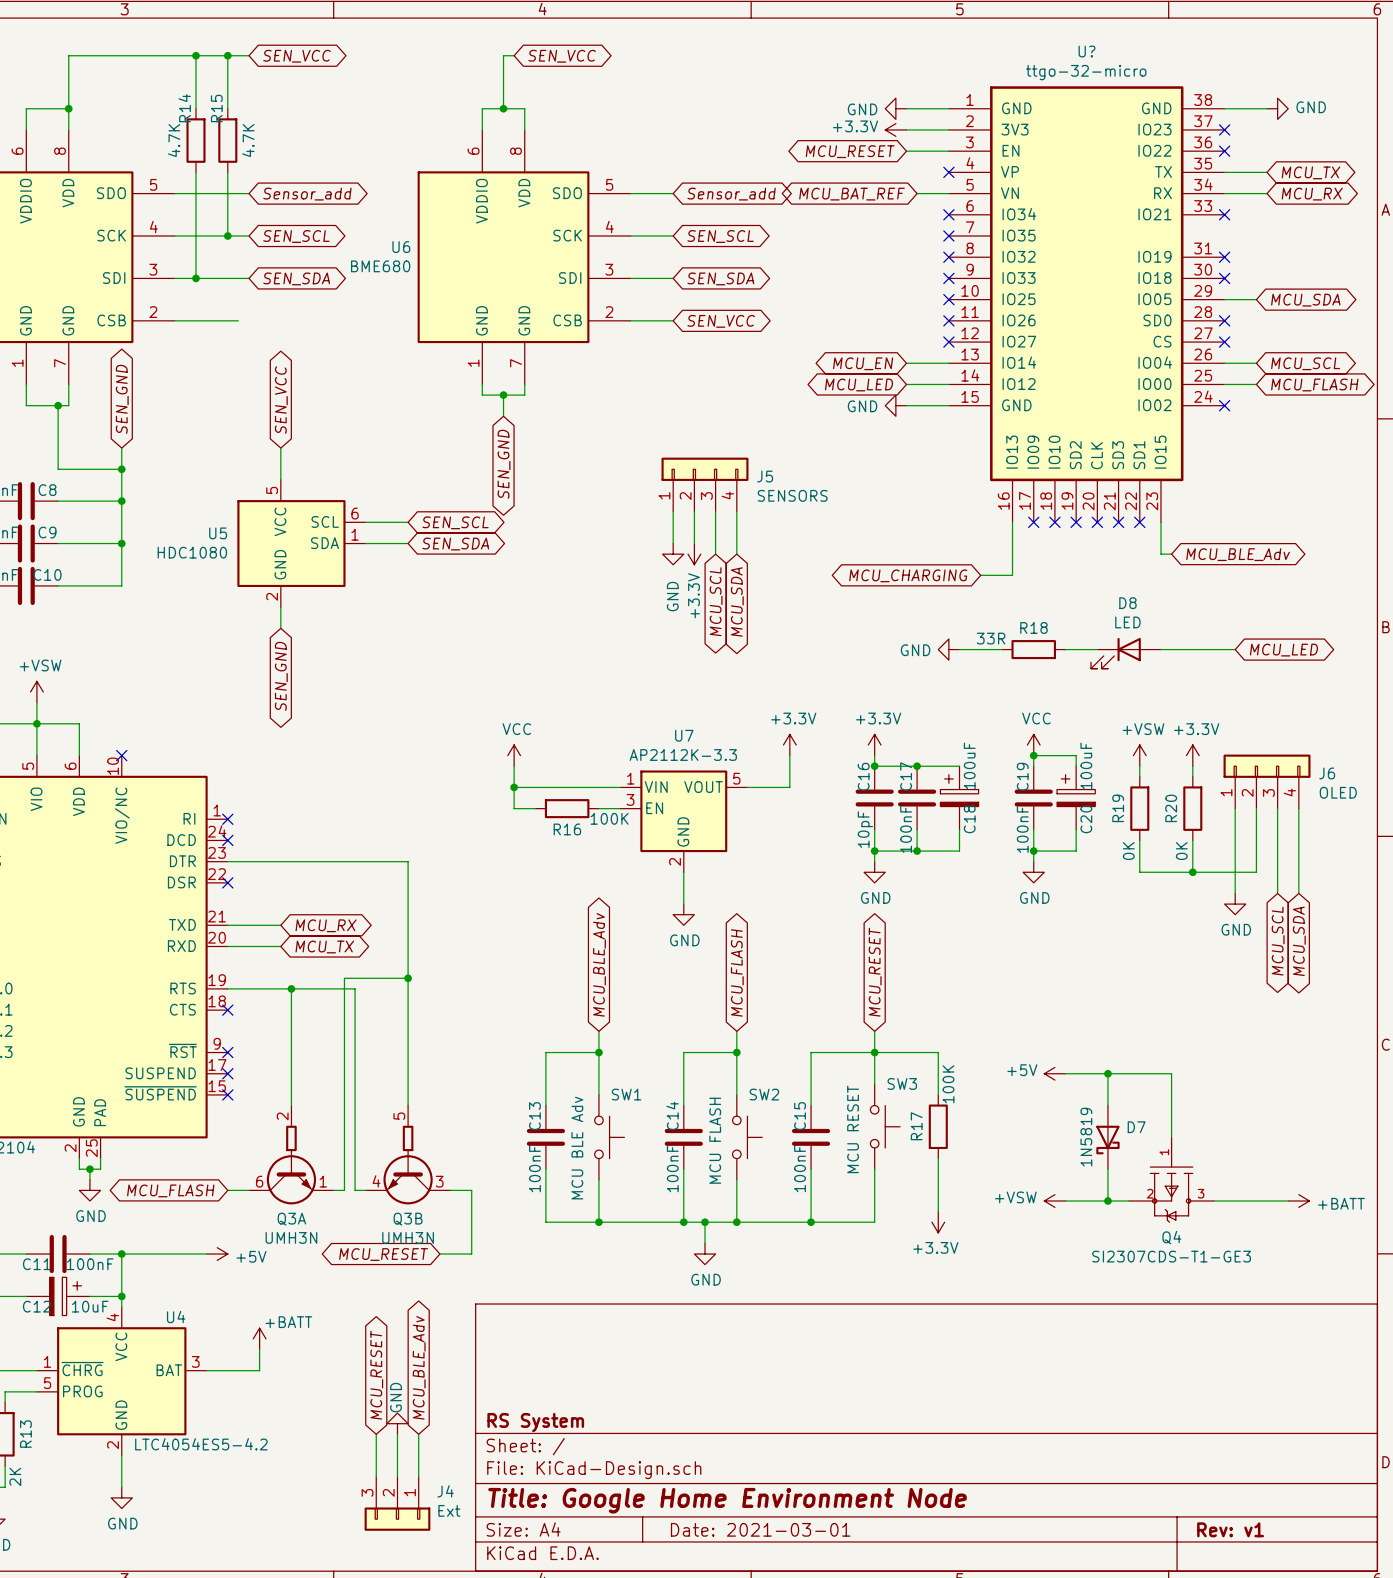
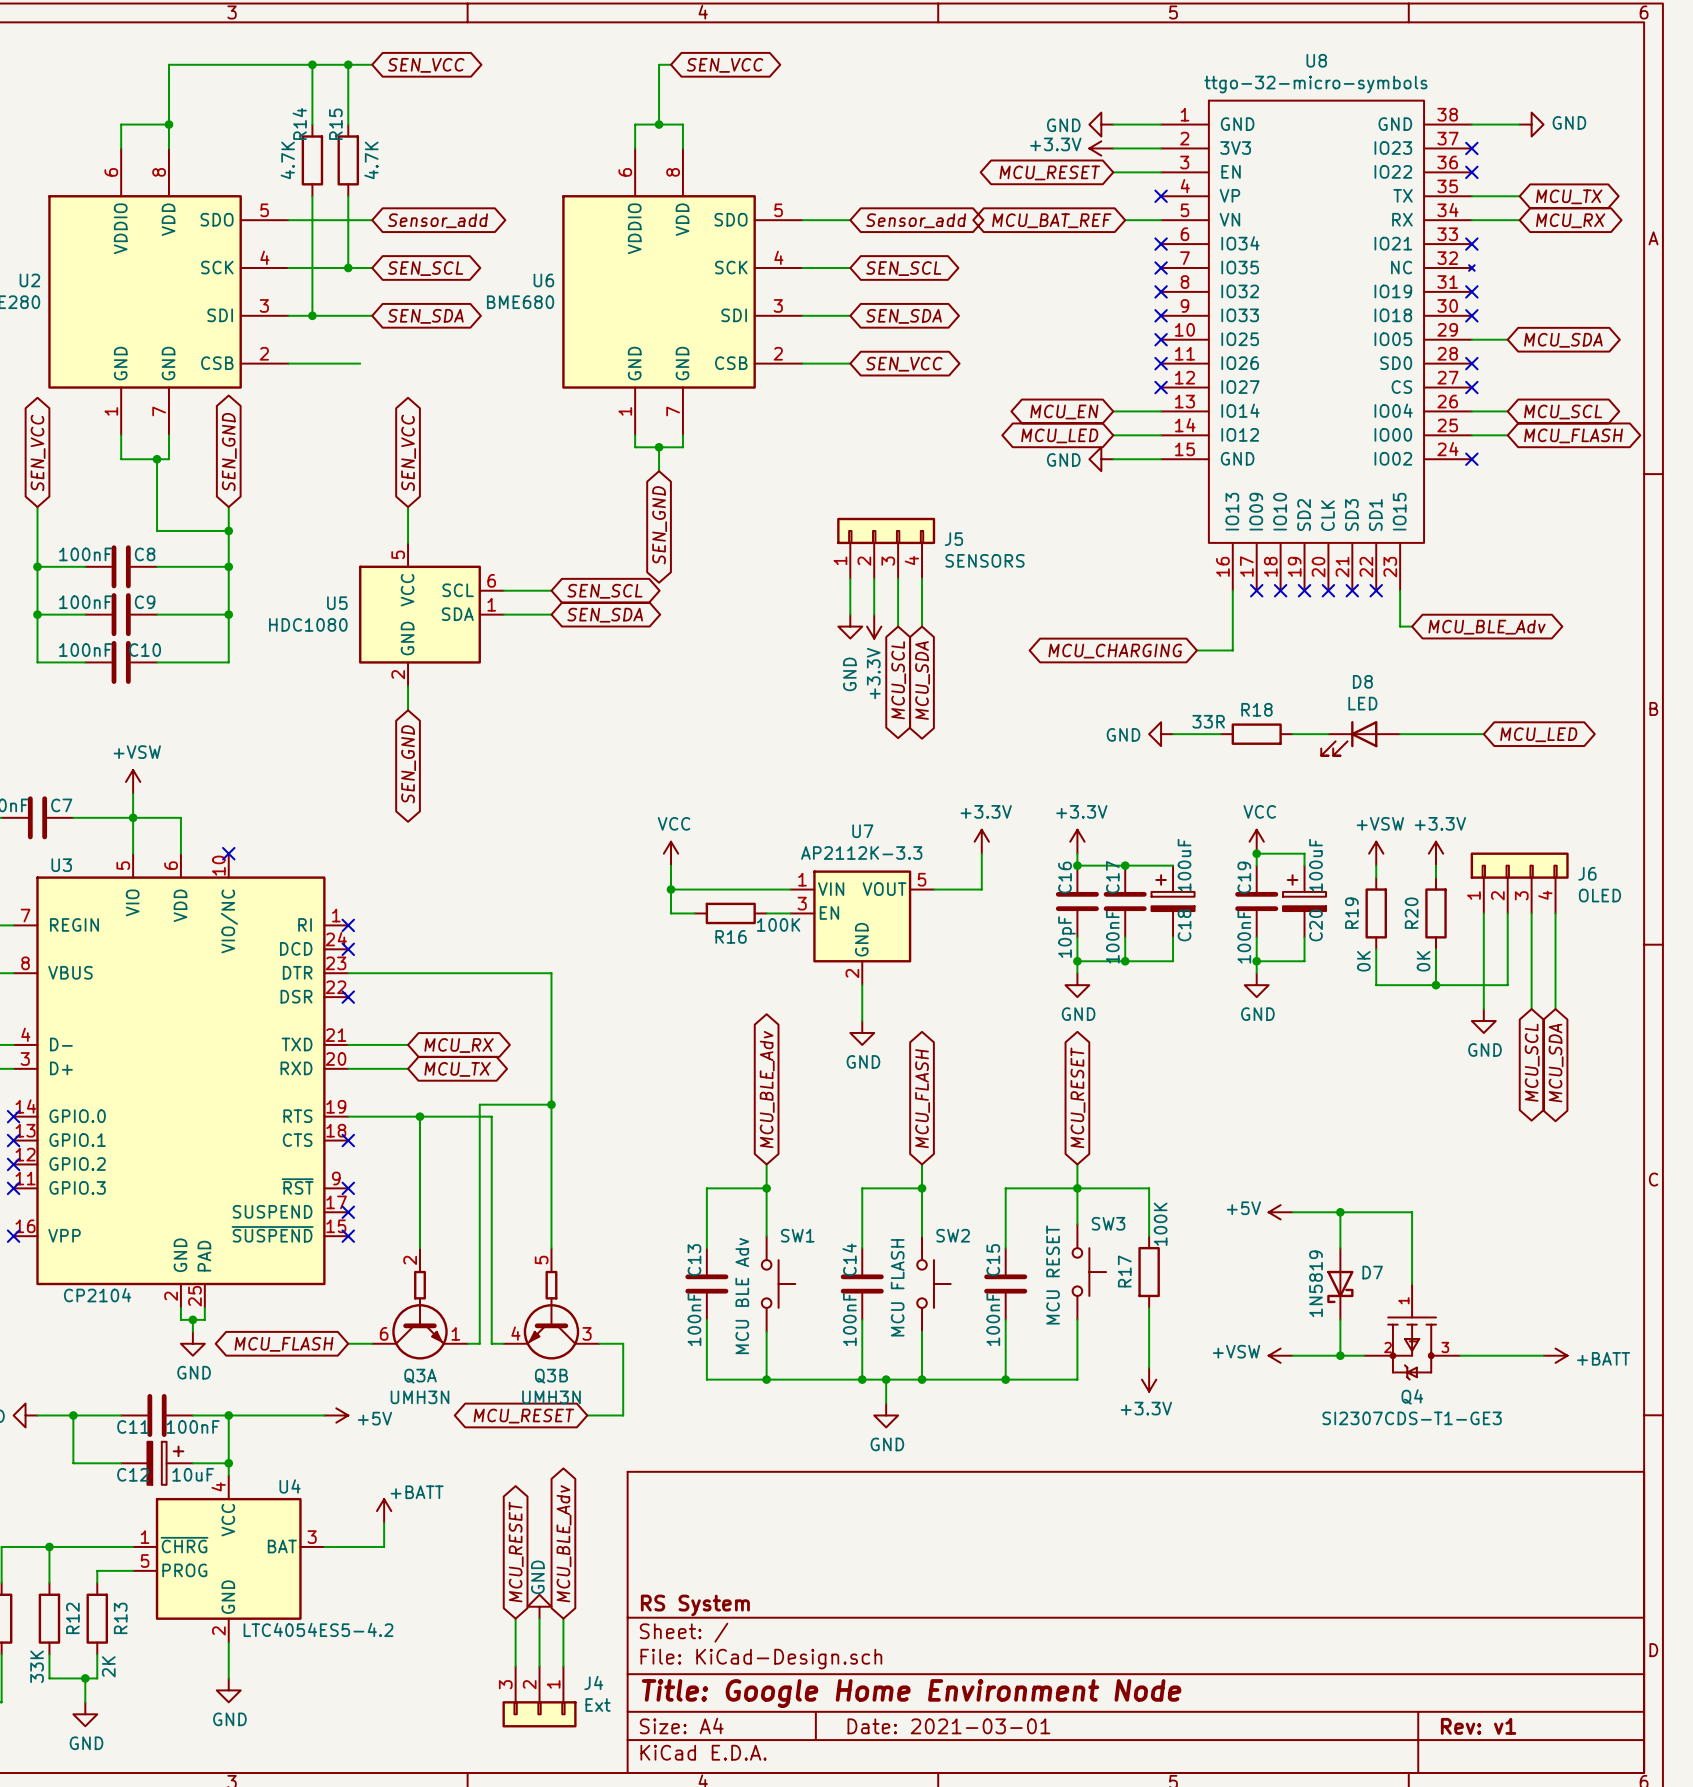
U?: ttgo-32-micro (1086, 304) -> none
U8: none -> ttgo-32-micro-symbols (1317, 345)

